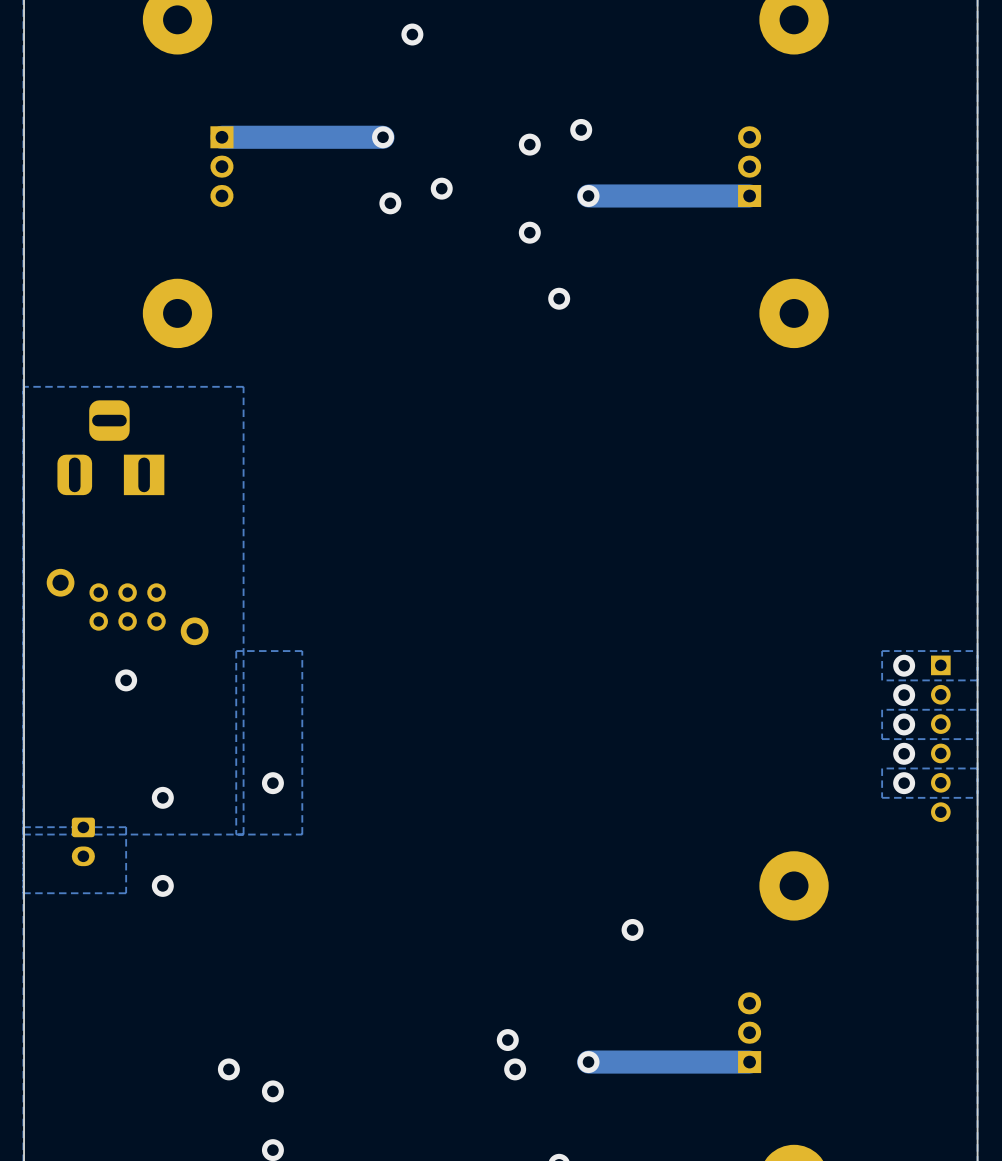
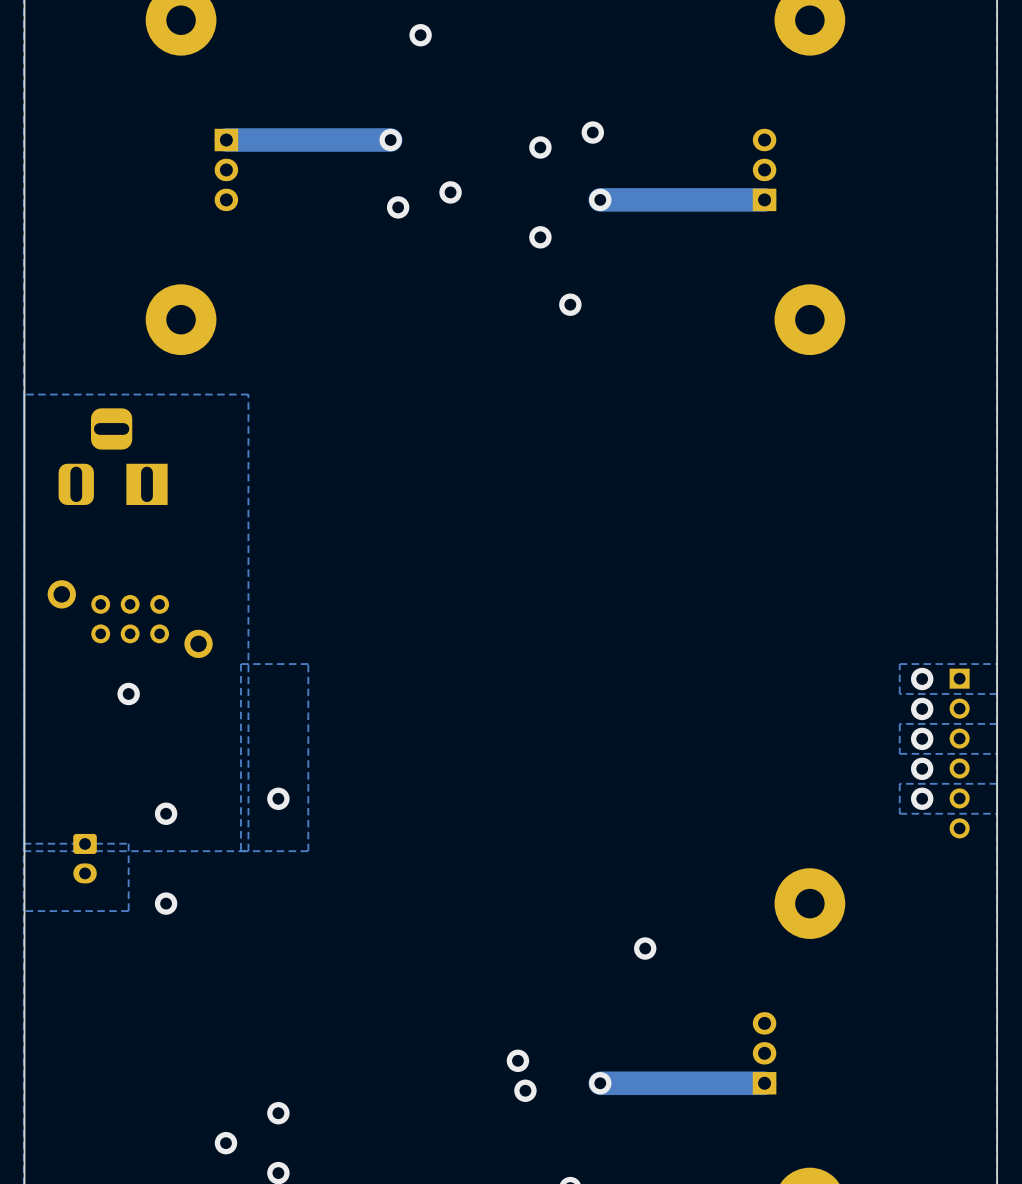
via position: (228, 1069) -> (225, 1143)

